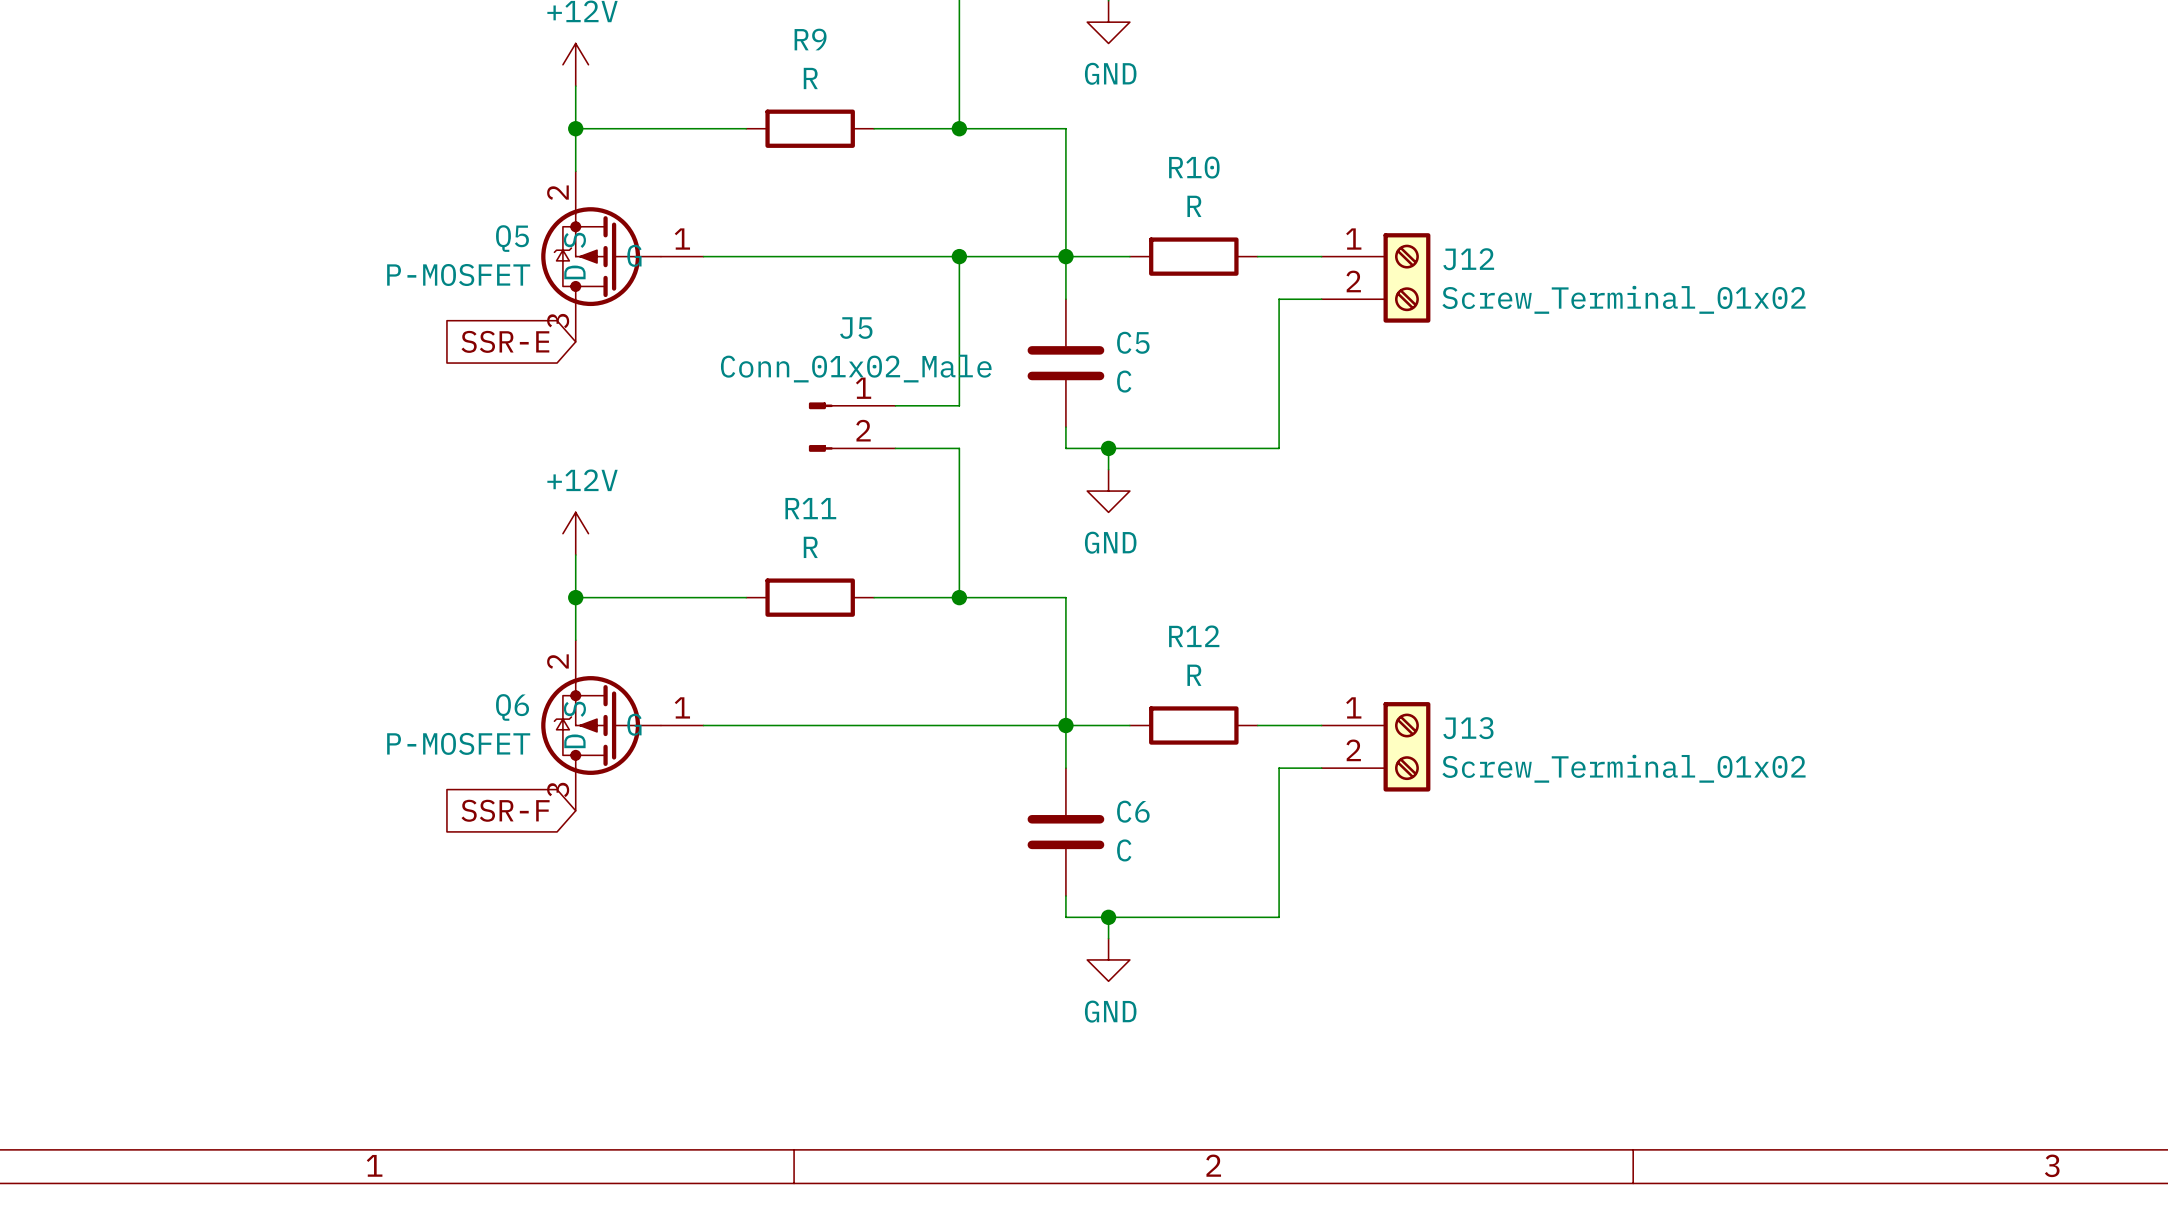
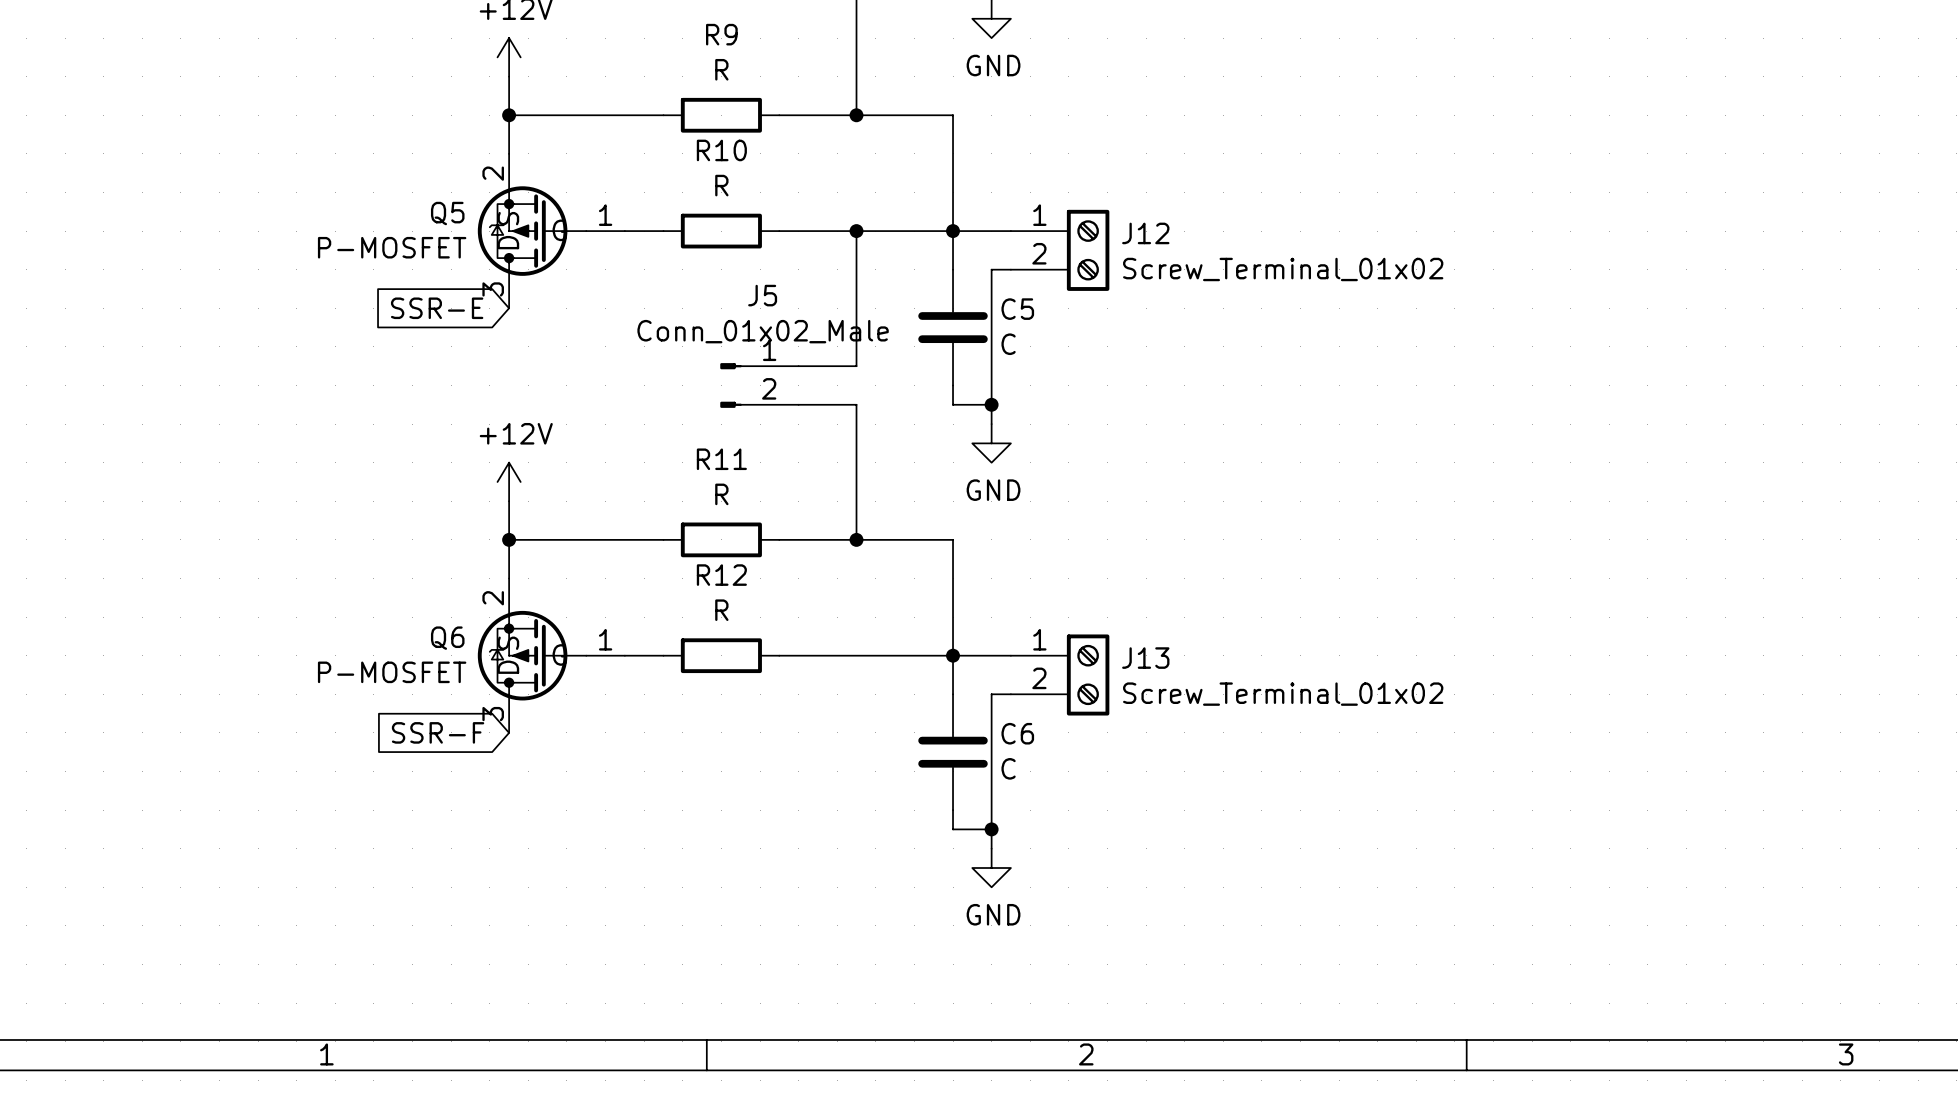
wire: (746, 256) (874, 256) -> none
R10 position: (1193, 256) -> (721, 231)
wire: (1257, 256) (1321, 256) -> none
J12 position: (1376, 277) -> (1060, 250)
wire: (1321, 299) (1279, 299) (1279, 448) (1108, 448) -> (1010, 269) (991, 269) (991, 404)
wire: (746, 725) (874, 725) -> none
R12 position: (1193, 725) -> (721, 655)
wire: (1257, 725) (1321, 725) -> none
J13 position: (1376, 746) -> (1060, 674)
wire: (1321, 768) (1279, 768) (1279, 917) (1108, 917) -> (1010, 694) (991, 694) (991, 829)

